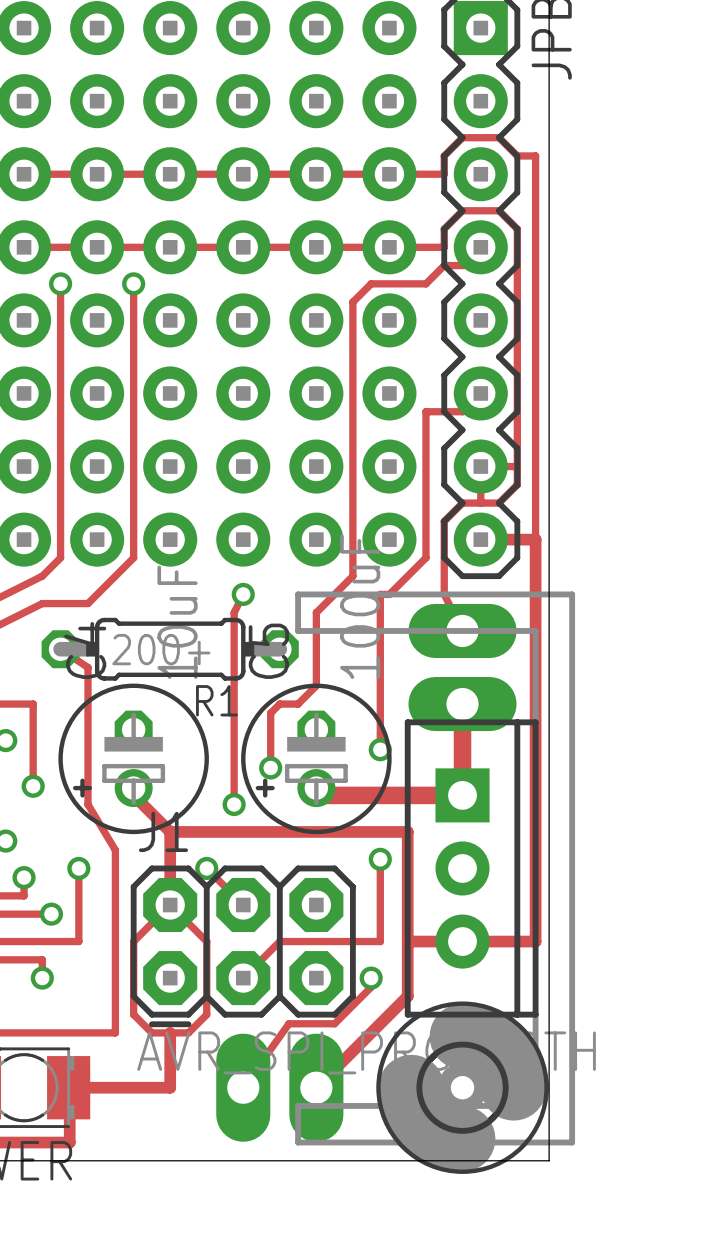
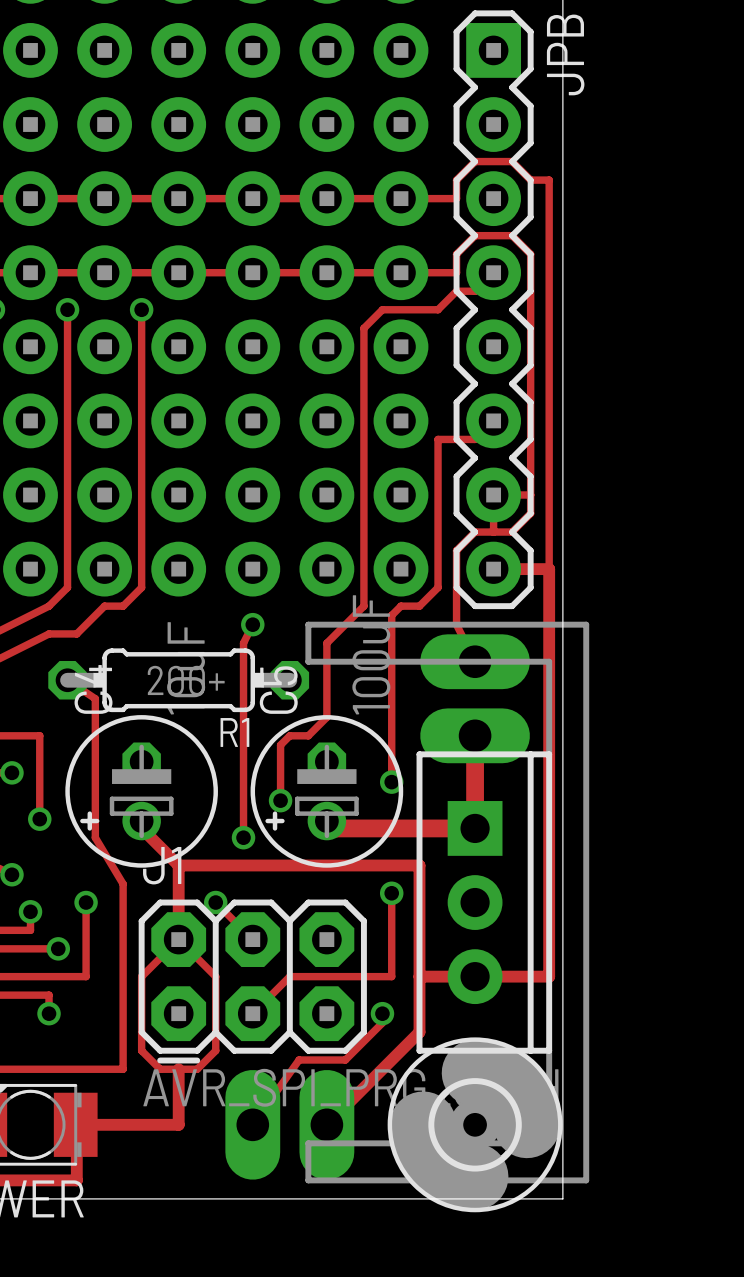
track: (115, 576) (87, 603) (69, 603) -> (123, 606) (104, 606) (76, 633)
track: (407, 576) (389, 594) (380, 594) -> (419, 606) (400, 606) (391, 615) (391, 624)

